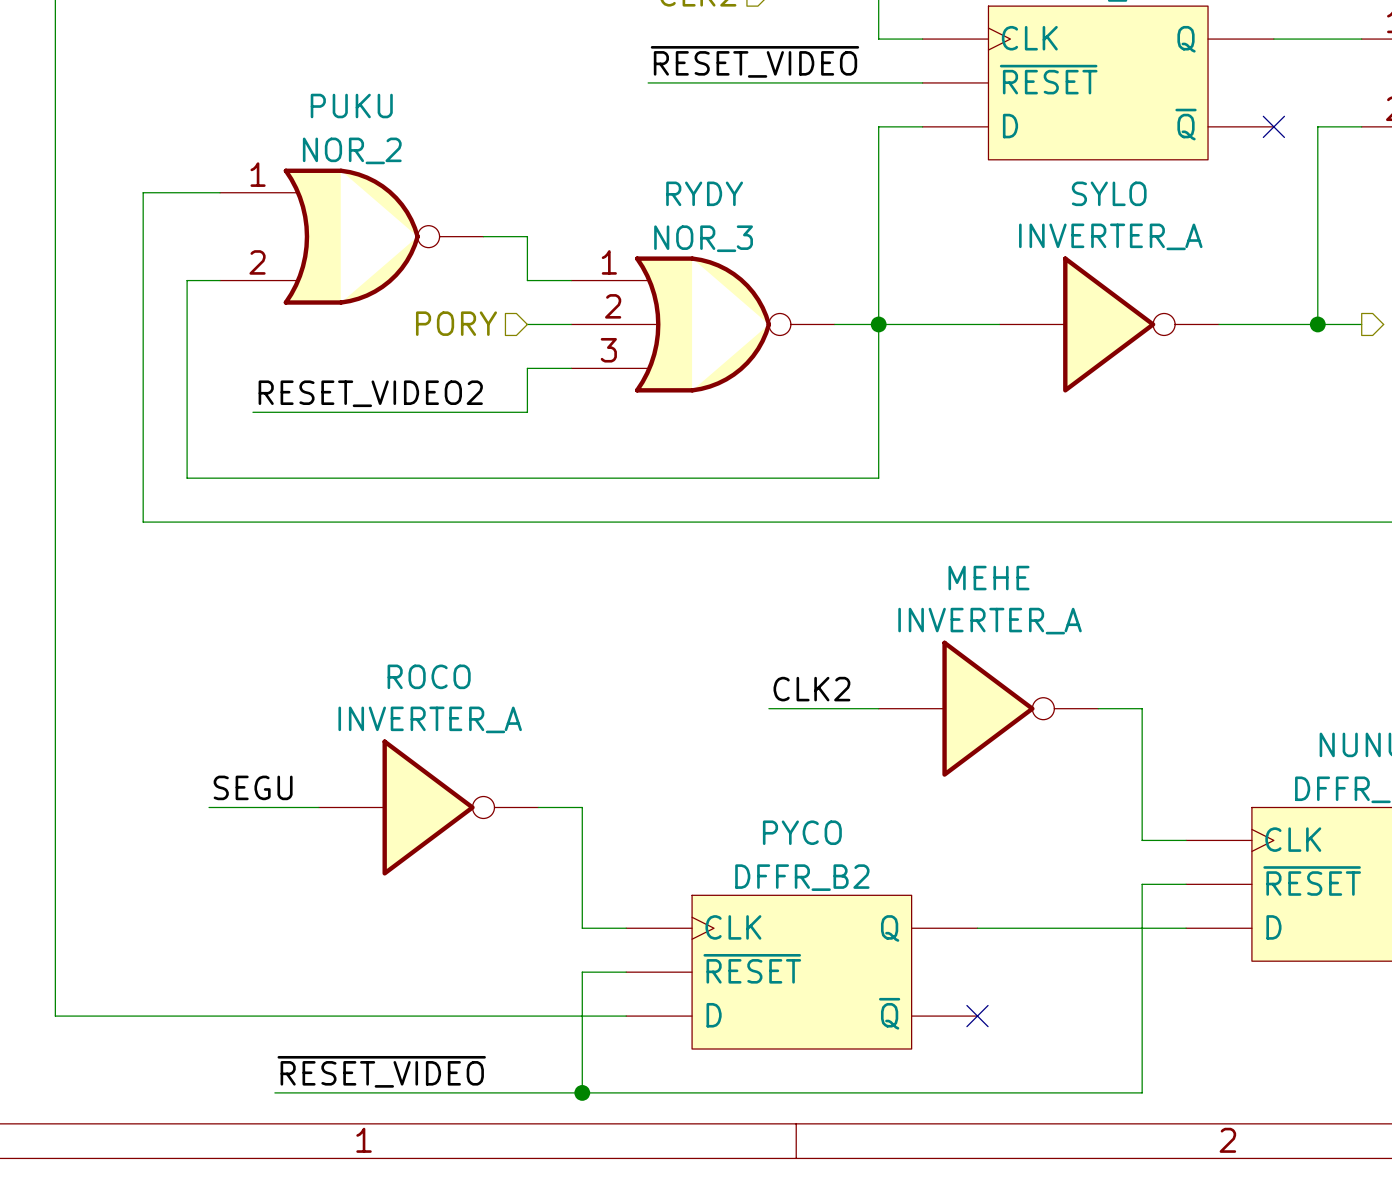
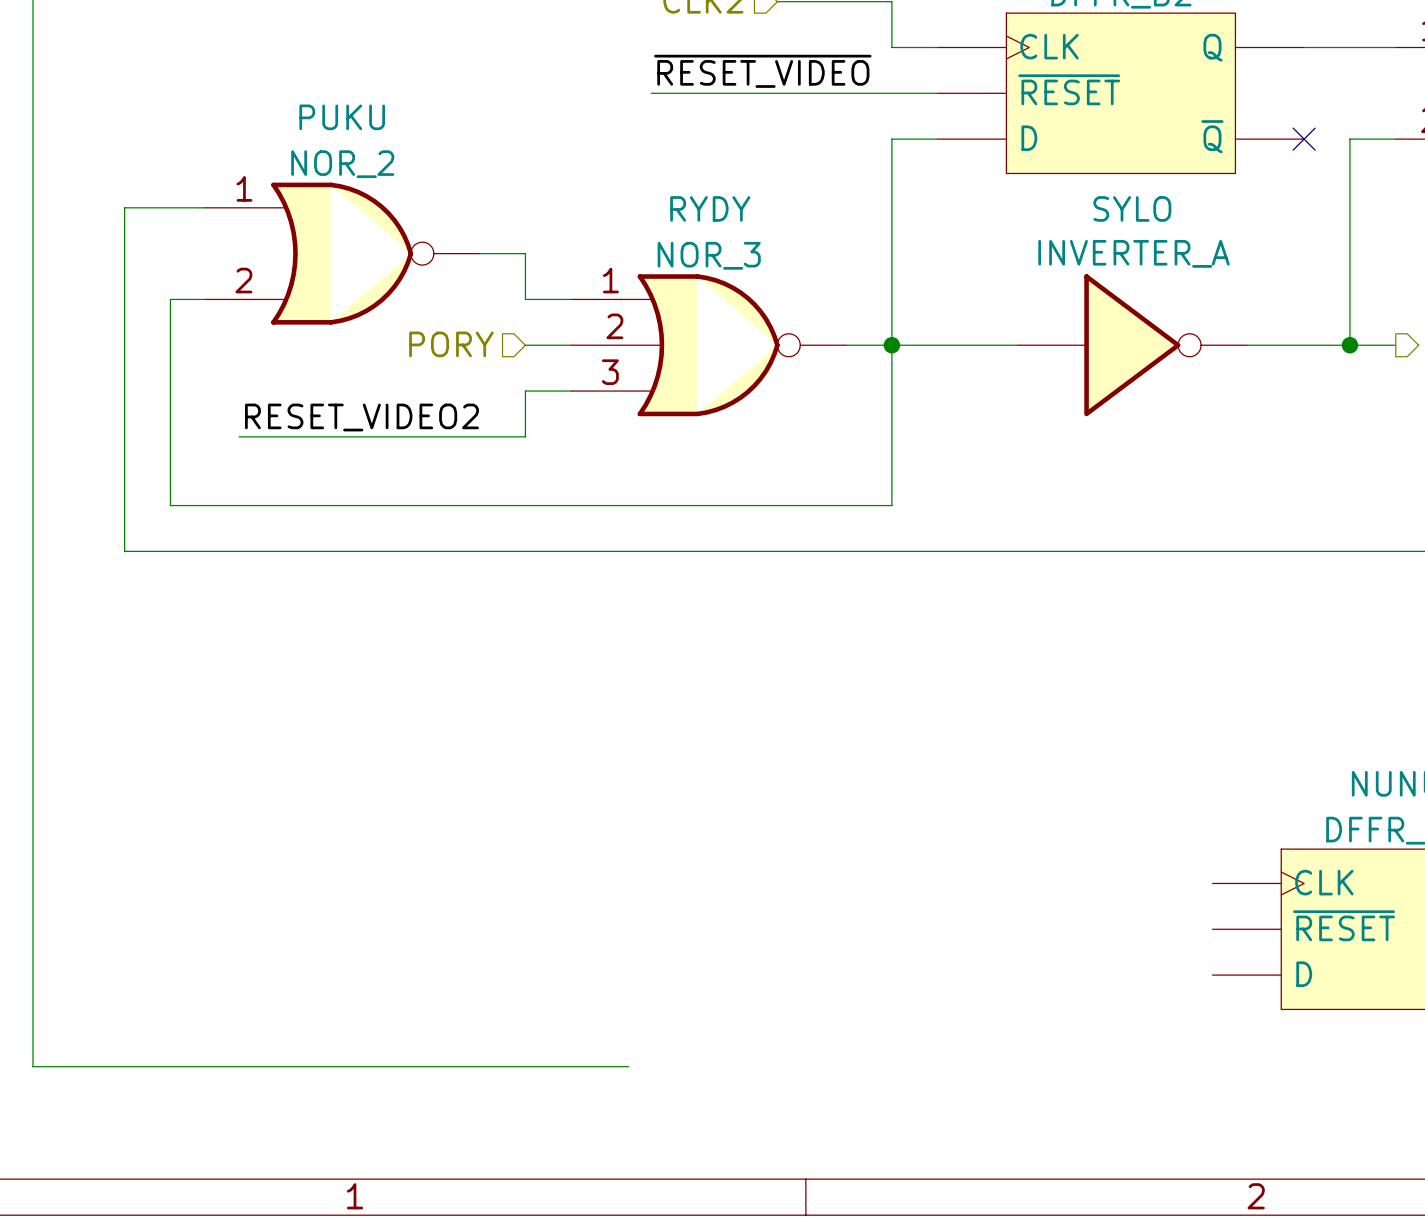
label: CLK2 (811, 689) -> none
wire: (768, 708) (878, 708) -> none
MEHE: INVERTER_A (988, 708) -> none
wire: (1098, 708) (1142, 708) (1142, 840) (1186, 840) -> none
label: SEGU (253, 787) -> none
wire: (209, 807) (318, 807) -> none
ROCO: INVERTER_A (428, 807) -> none
wire: (538, 807) (582, 807) (582, 928) (626, 928) -> none
wire: (1186, 884) (1142, 884) (1142, 1092) (274, 1092) -> none
wire: (977, 928) (1186, 928) -> none
wire: (626, 972) (582, 972) (582, 1092) -> none
PYCO: DFFR_B2 (801, 972) -> none
no-connect mark: (977, 1016) -> none
label: ~{RESET_VIDEO} (381, 1071) -> none
junction: (582, 1092) -> none

